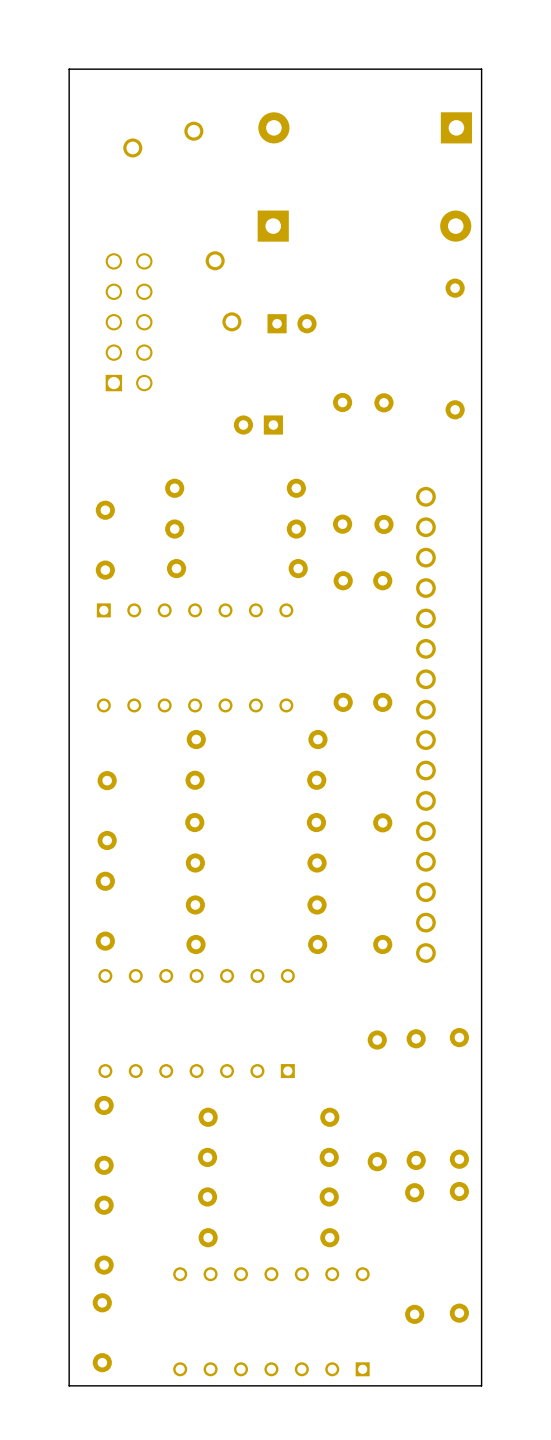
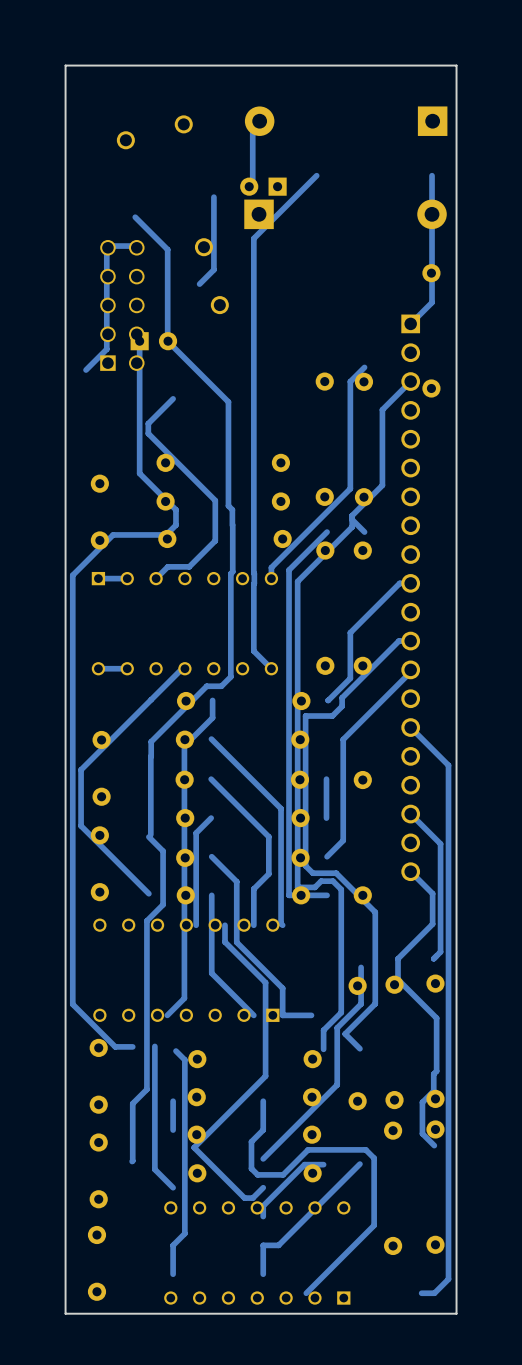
track: none -> (252, 119) (252, 183) (249, 186)
track: none -> (316, 175) (253, 238) (253, 651) (271, 668)
track: none -> (432, 175) (432, 302) (410, 323)
part: none -> (263, 186)
track: none -> (213, 197) (213, 269) (199, 284)
track: none -> (135, 217) (167, 249) (167, 341) (228, 401) (228, 505) (232, 509) (232, 525)
track: none -> (135, 246) (106, 246) (106, 349) (86, 370)
part: (292, 323) -> none
track: none -> (139, 341) (139, 473) (175, 509) (175, 525) (166, 534) (113, 534) (72, 575) (72, 1004) (115, 1046) (132, 1046)
part: none -> (153, 341)
track: none -> (364, 367) (350, 381) (350, 488) (271, 567) (271, 578)
track: none -> (410, 381) (382, 409) (382, 485) (352, 515) (352, 527) (297, 581) (297, 887) (314, 887) (321, 881) (332, 881) (341, 889) (341, 1012) (323, 1030) (323, 1049)
track: none -> (173, 398) (148, 423) (148, 433) (215, 500) (215, 540) (189, 566) (167, 566) (156, 578)
part: (258, 425) -> none
track: none -> (352, 519) (364, 532)
track: none -> (232, 525) (230, 676) (221, 686) (206, 686) (151, 741) (151, 756)
track: none -> (327, 532) (289, 570) (289, 895) (327, 895)
track: none -> (127, 578) (98, 578)
track: none -> (410, 583) (399, 583) (350, 632) (350, 678) (327, 700)
part: none -> (410, 597)
track: none -> (410, 641) (398, 641) (342, 697) (342, 706) (332, 716) (305, 716) (305, 865) (312, 873) (336, 873) (375, 912) (375, 1003) (345, 1033) (359, 1048)
track: none -> (127, 668) (98, 668)
track: none -> (184, 668) (182, 668) (81, 769) (81, 825) (148, 893)
track: none -> (410, 669) (410, 672) (343, 739) (343, 840) (327, 856)
part: (425, 724) -> none
track: none -> (212, 700) (212, 717) (184, 746) (184, 998) (167, 1015)
track: none -> (410, 727) (448, 765) (448, 1279) (434, 1293) (421, 1293)
track: none -> (211, 739) (281, 808) (281, 923) (282, 925)
track: none -> (150, 756) (150, 834)
track: none -> (211, 779) (268, 836) (268, 874) (253, 889) (253, 925)
track: none -> (326, 779) (326, 818)
track: none -> (410, 814) (440, 843) (440, 951) (433, 958)
track: none -> (211, 818) (196, 833) (196, 925)
track: none -> (148, 836) (163, 851) (163, 904) (146, 920) (146, 1089) (132, 1103) (132, 1161)
track: none -> (211, 856) (236, 881) (236, 942) (282, 988) (282, 1015) (311, 1015)
track: none -> (410, 871) (432, 893) (432, 924) (398, 958) (398, 979) (436, 1018) (436, 1071) (433, 1074) (433, 1091) (422, 1102) (422, 1133) (434, 1145)
track: none -> (211, 895) (211, 973) (253, 1015)
track: none -> (225, 925) (225, 942) (265, 982) (265, 1076) (194, 1147) (244, 1198) (252, 1198) (263, 1187)
track: none -> (361, 967) (361, 1004) (337, 1027) (337, 1084) (263, 1158)
track: none -> (154, 1046) (154, 1169) (173, 1187)
track: none -> (175, 1051) (184, 1059) (184, 1233) (173, 1245) (173, 1274)
track: none -> (173, 1101) (173, 1130)
track: none -> (263, 1101) (263, 1130) (251, 1141) (251, 1168) (257, 1174) (283, 1174) (308, 1149) (365, 1149) (374, 1158) (374, 1225) (306, 1293)
track: none -> (359, 1164) (278, 1245) (263, 1245) (263, 1274)
track: none -> (323, 1164) (304, 1164) (263, 1206) (263, 1216)

